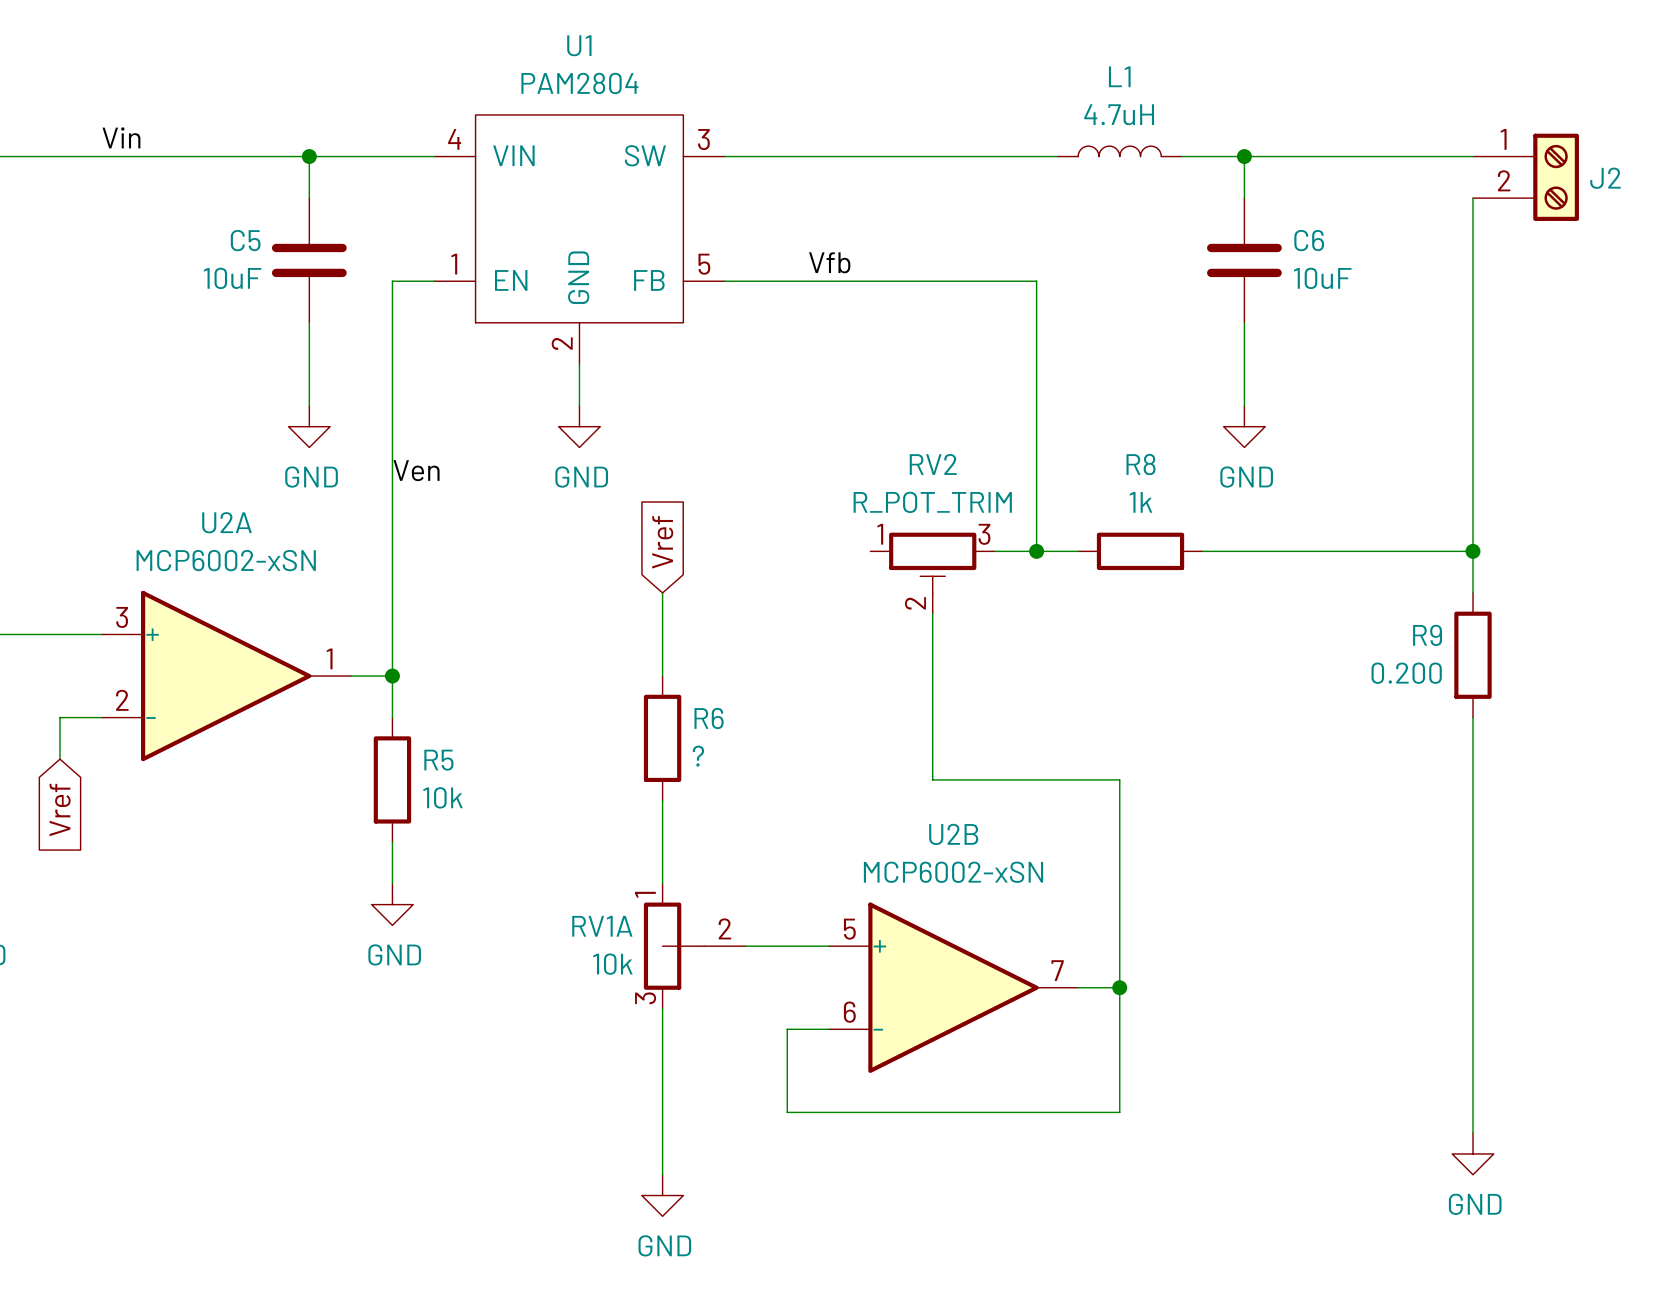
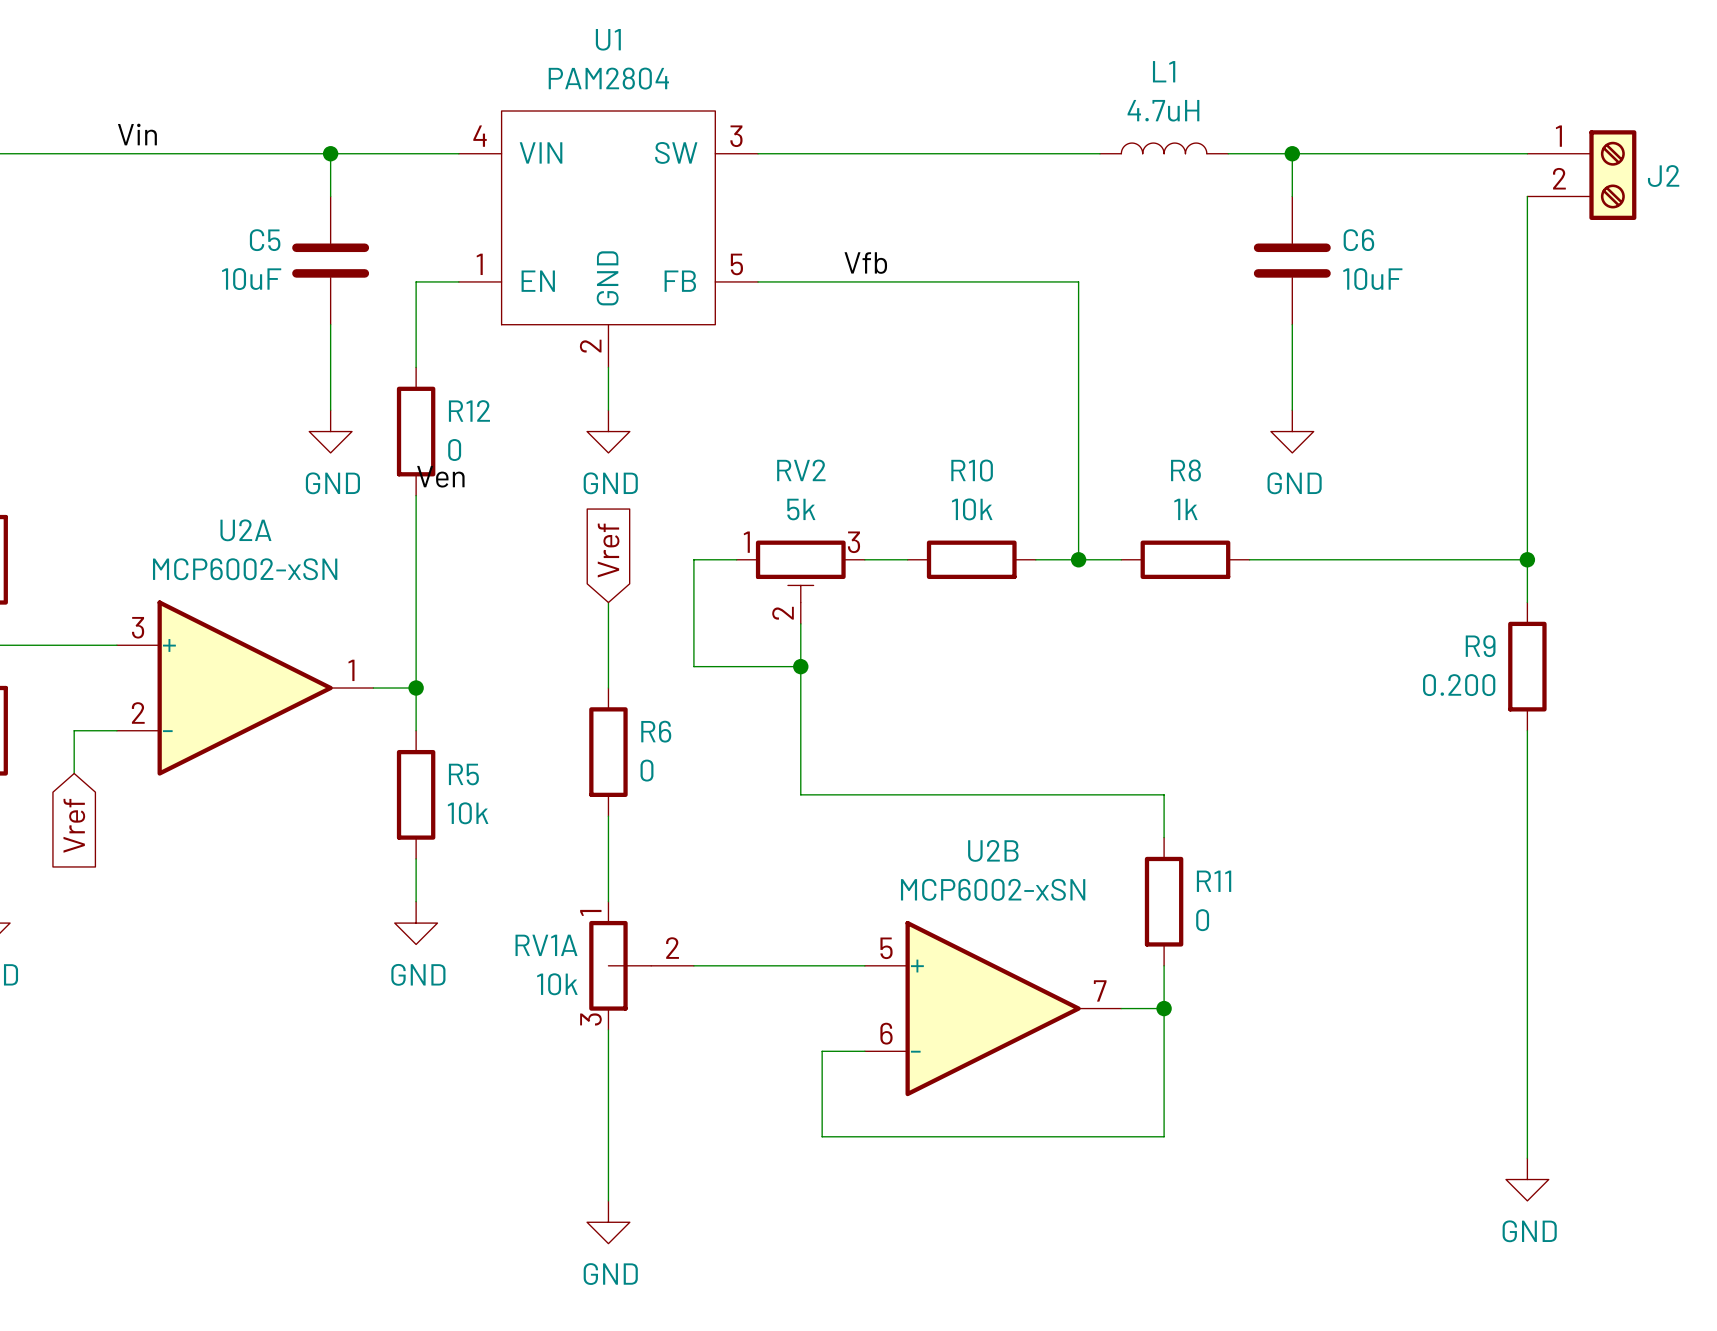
wire: (392, 364) (392, 489) -> none
R12: none -> 0 (416, 431)
RV2 value: R_POT_TRIM (932, 502) -> 5k (801, 509)
global label position: Vref (662, 542) -> Vref (608, 550)
wire: none -> (736, 559) (693, 559) (693, 602)
wire: none -> (864, 559) (907, 559)
R10: none -> 10k (971, 559)
RV2 position: (932, 573) -> (800, 582)
wire: none -> (608, 602) (608, 688)
wire: (932, 613) (932, 779) -> (800, 623) (800, 794) (971, 794)
wire: (662, 655) (662, 676) -> (693, 666) (800, 666)
junction: none -> (800, 666)
R6 position: (662, 738) -> (608, 752)
R6 value: ? (698, 756) -> 0 (646, 770)
wire: (662, 800) (662, 883) -> (608, 816) (608, 901)
wire: (1119, 821) (1119, 946) -> none
R11: none -> 0 (1164, 901)
RV1A position: (694, 946) -> (641, 965)
wire: (662, 1008) (662, 1174) -> (608, 1029) (608, 1200)
power symbol position: GND (662, 1195) -> GND (608, 1222)

